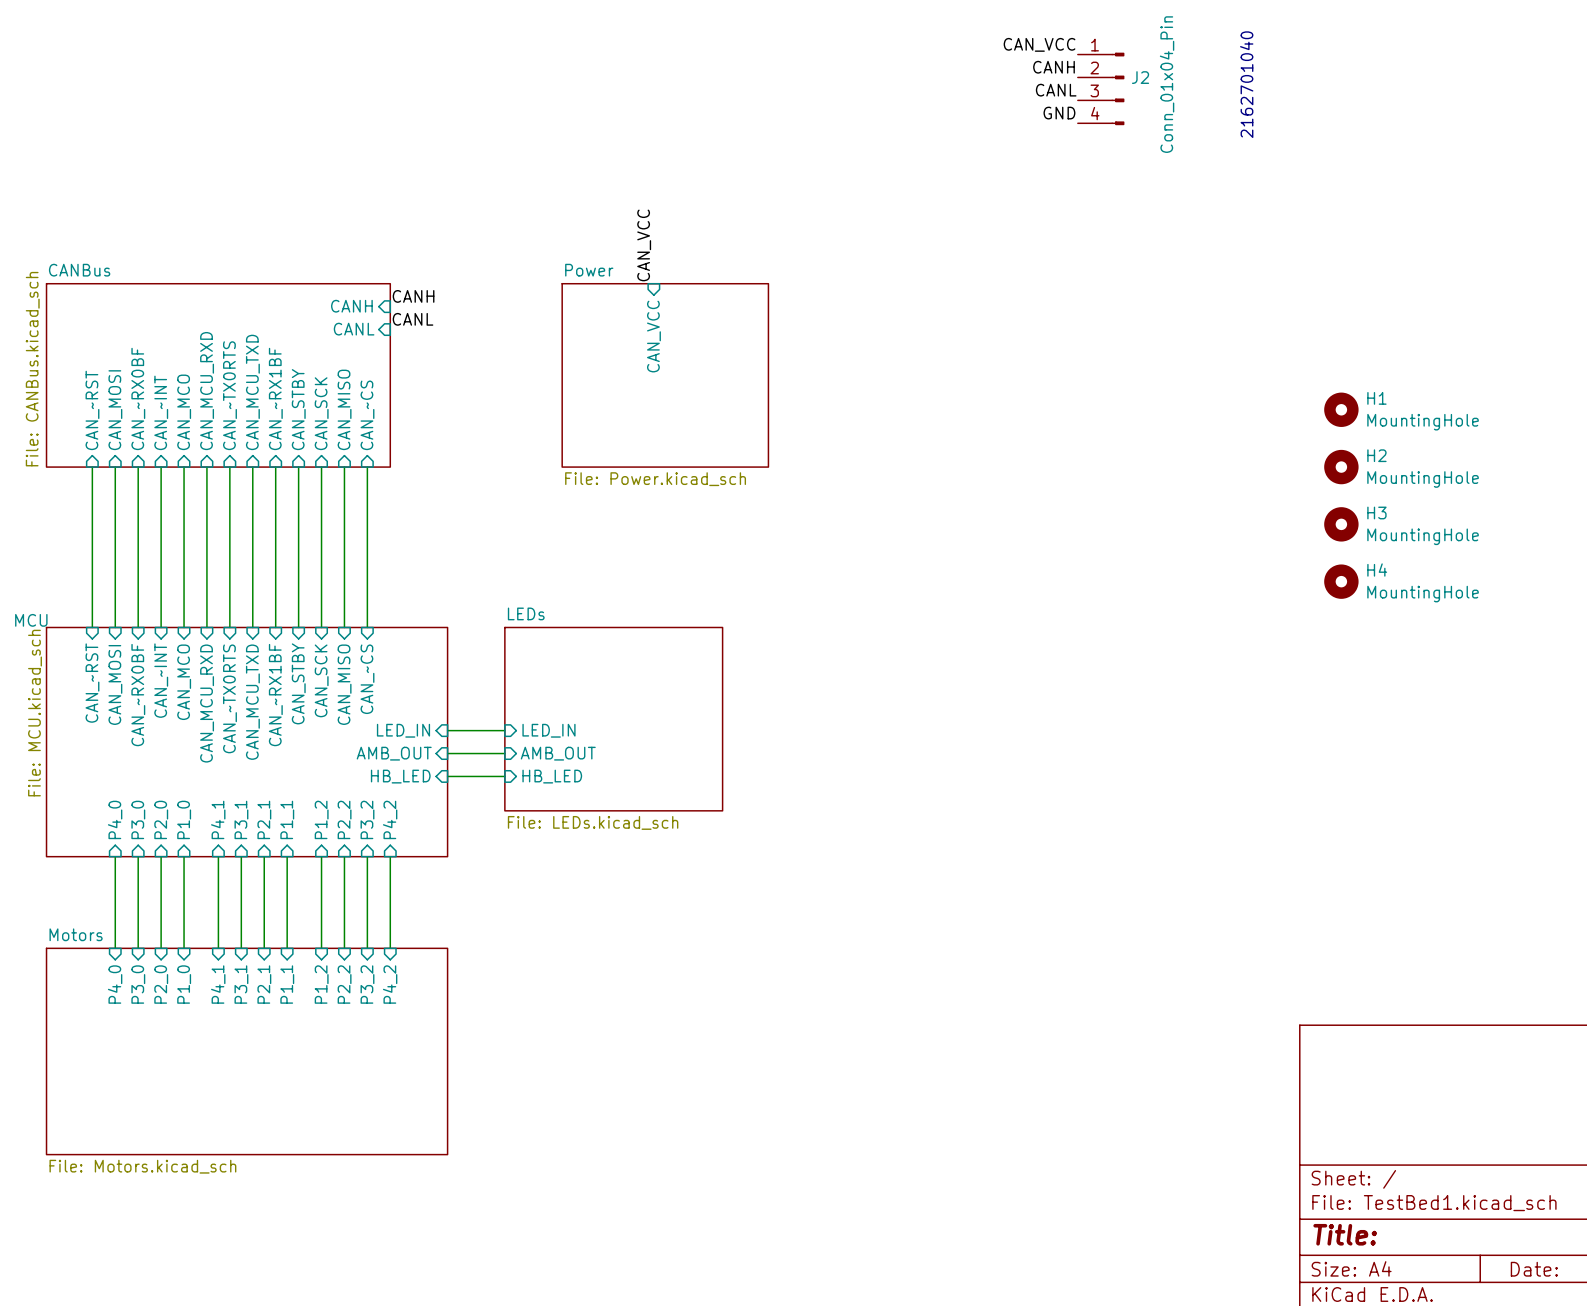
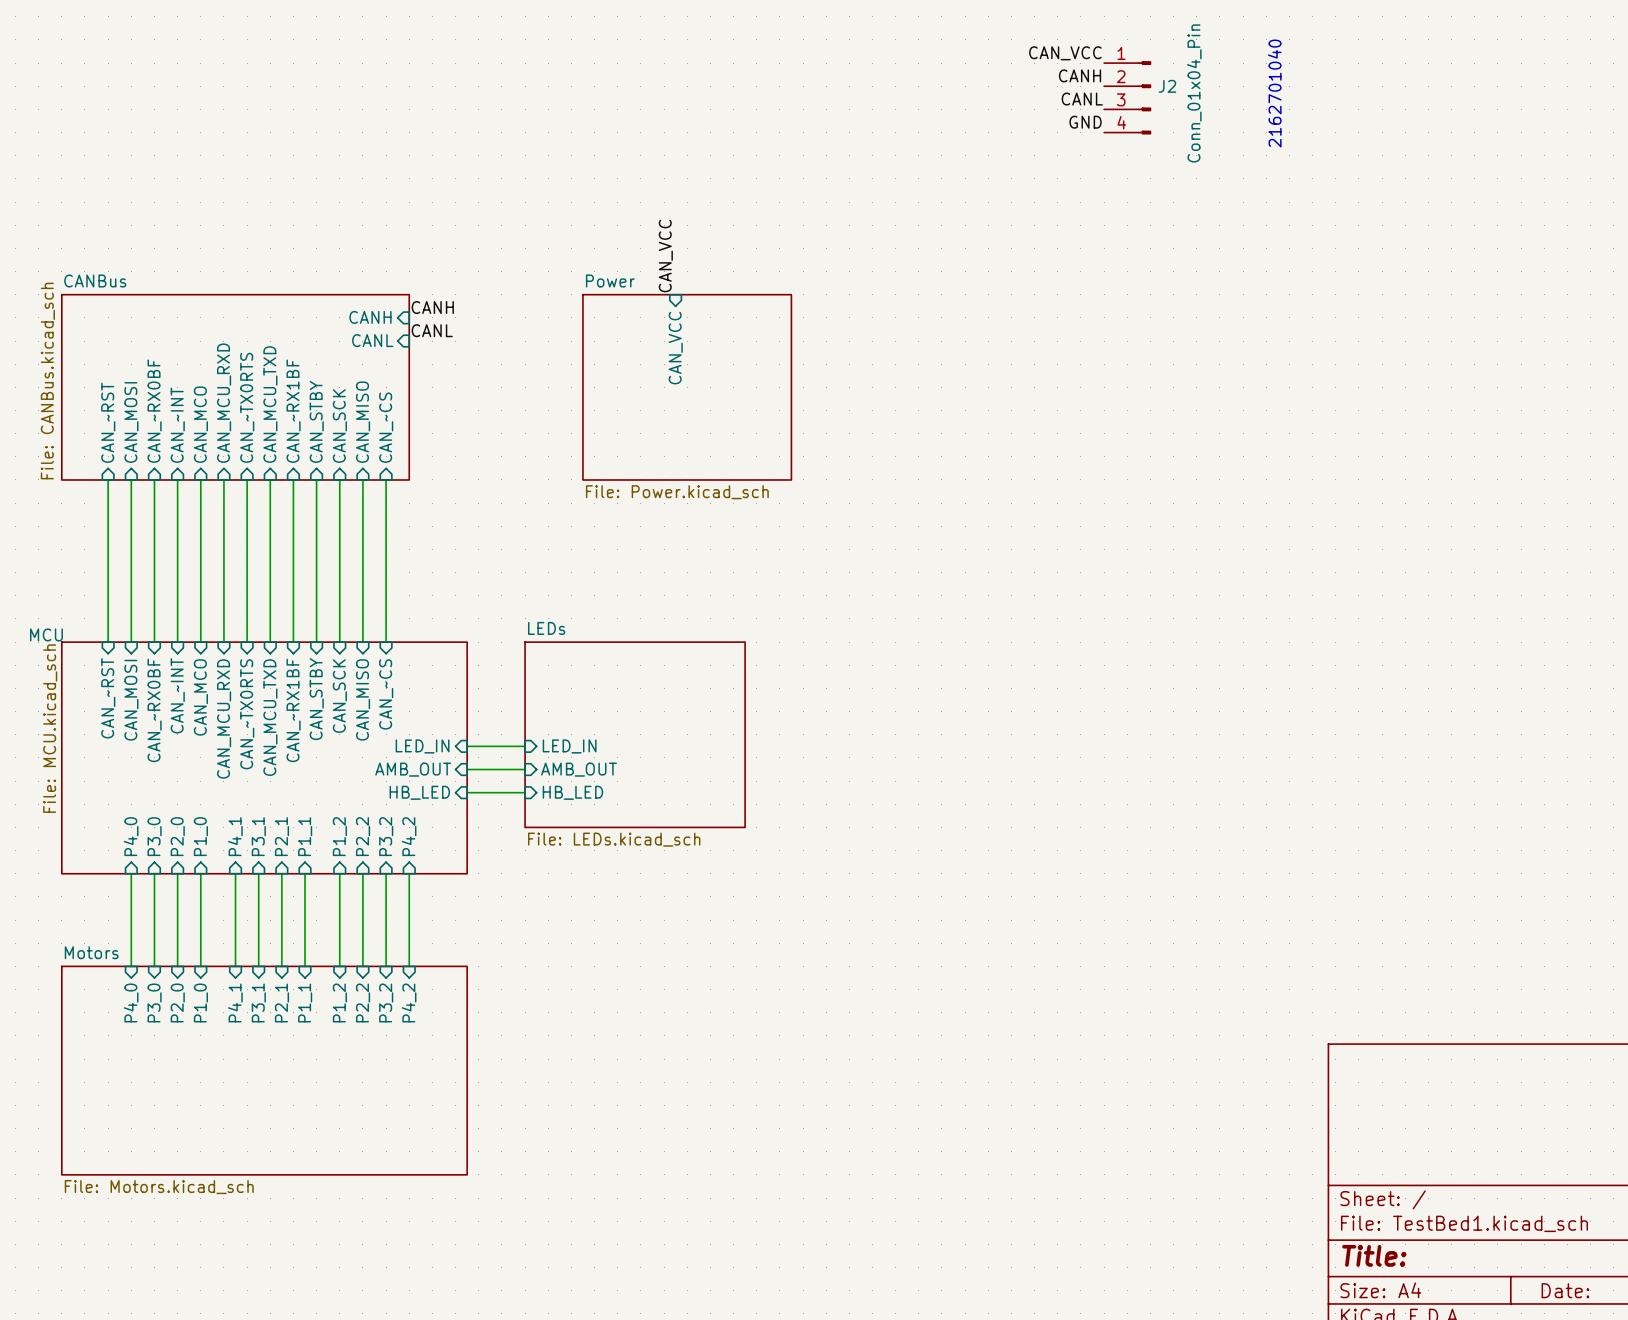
H1: MountingHole (1341, 409) -> none
H2: MountingHole (1341, 467) -> none
H3: MountingHole (1341, 524) -> none
H4: MountingHole (1341, 581) -> none

